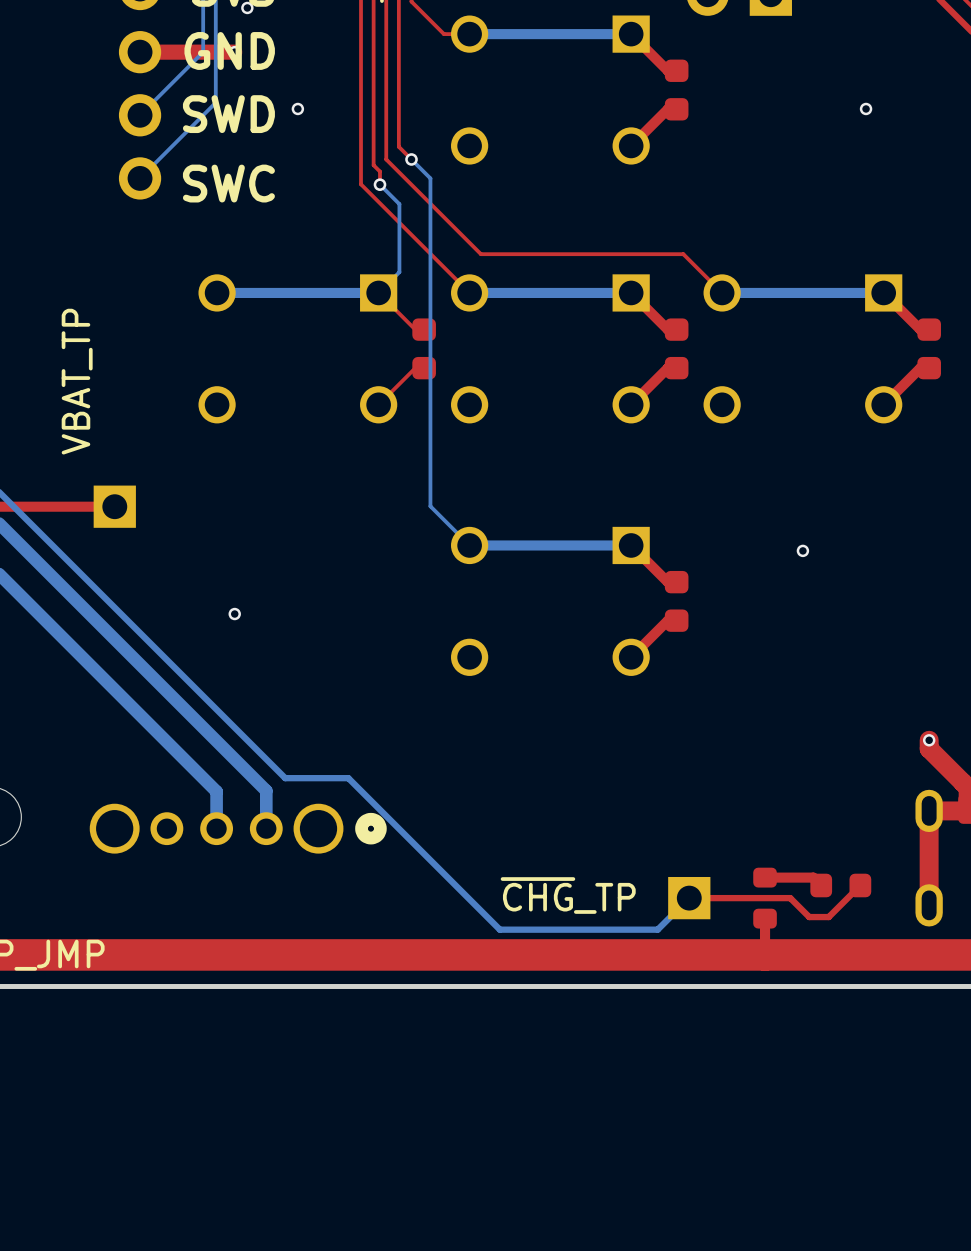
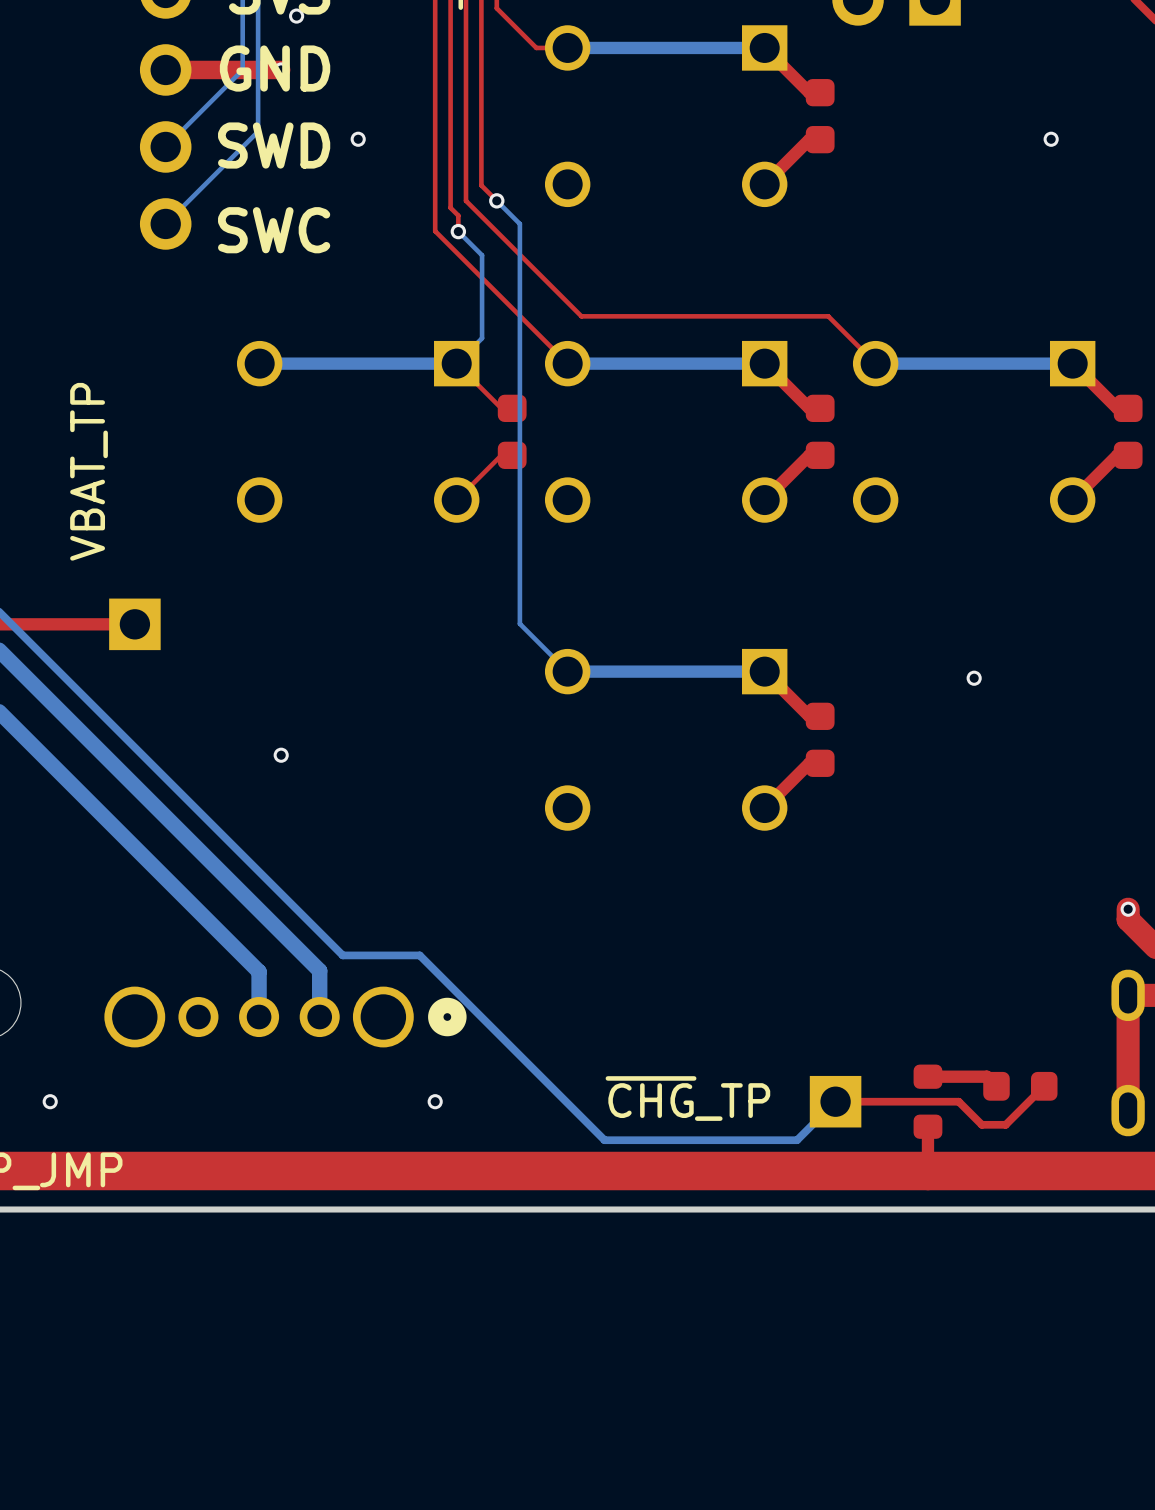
via: none -> (50, 1101)
via: none -> (435, 1101)

